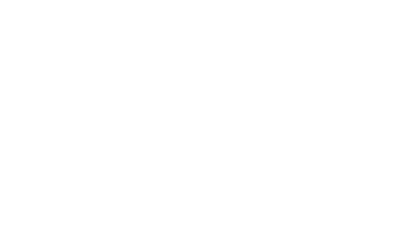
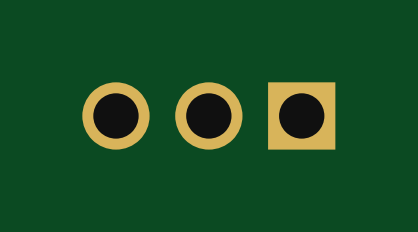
part: none -> (208, 115)

